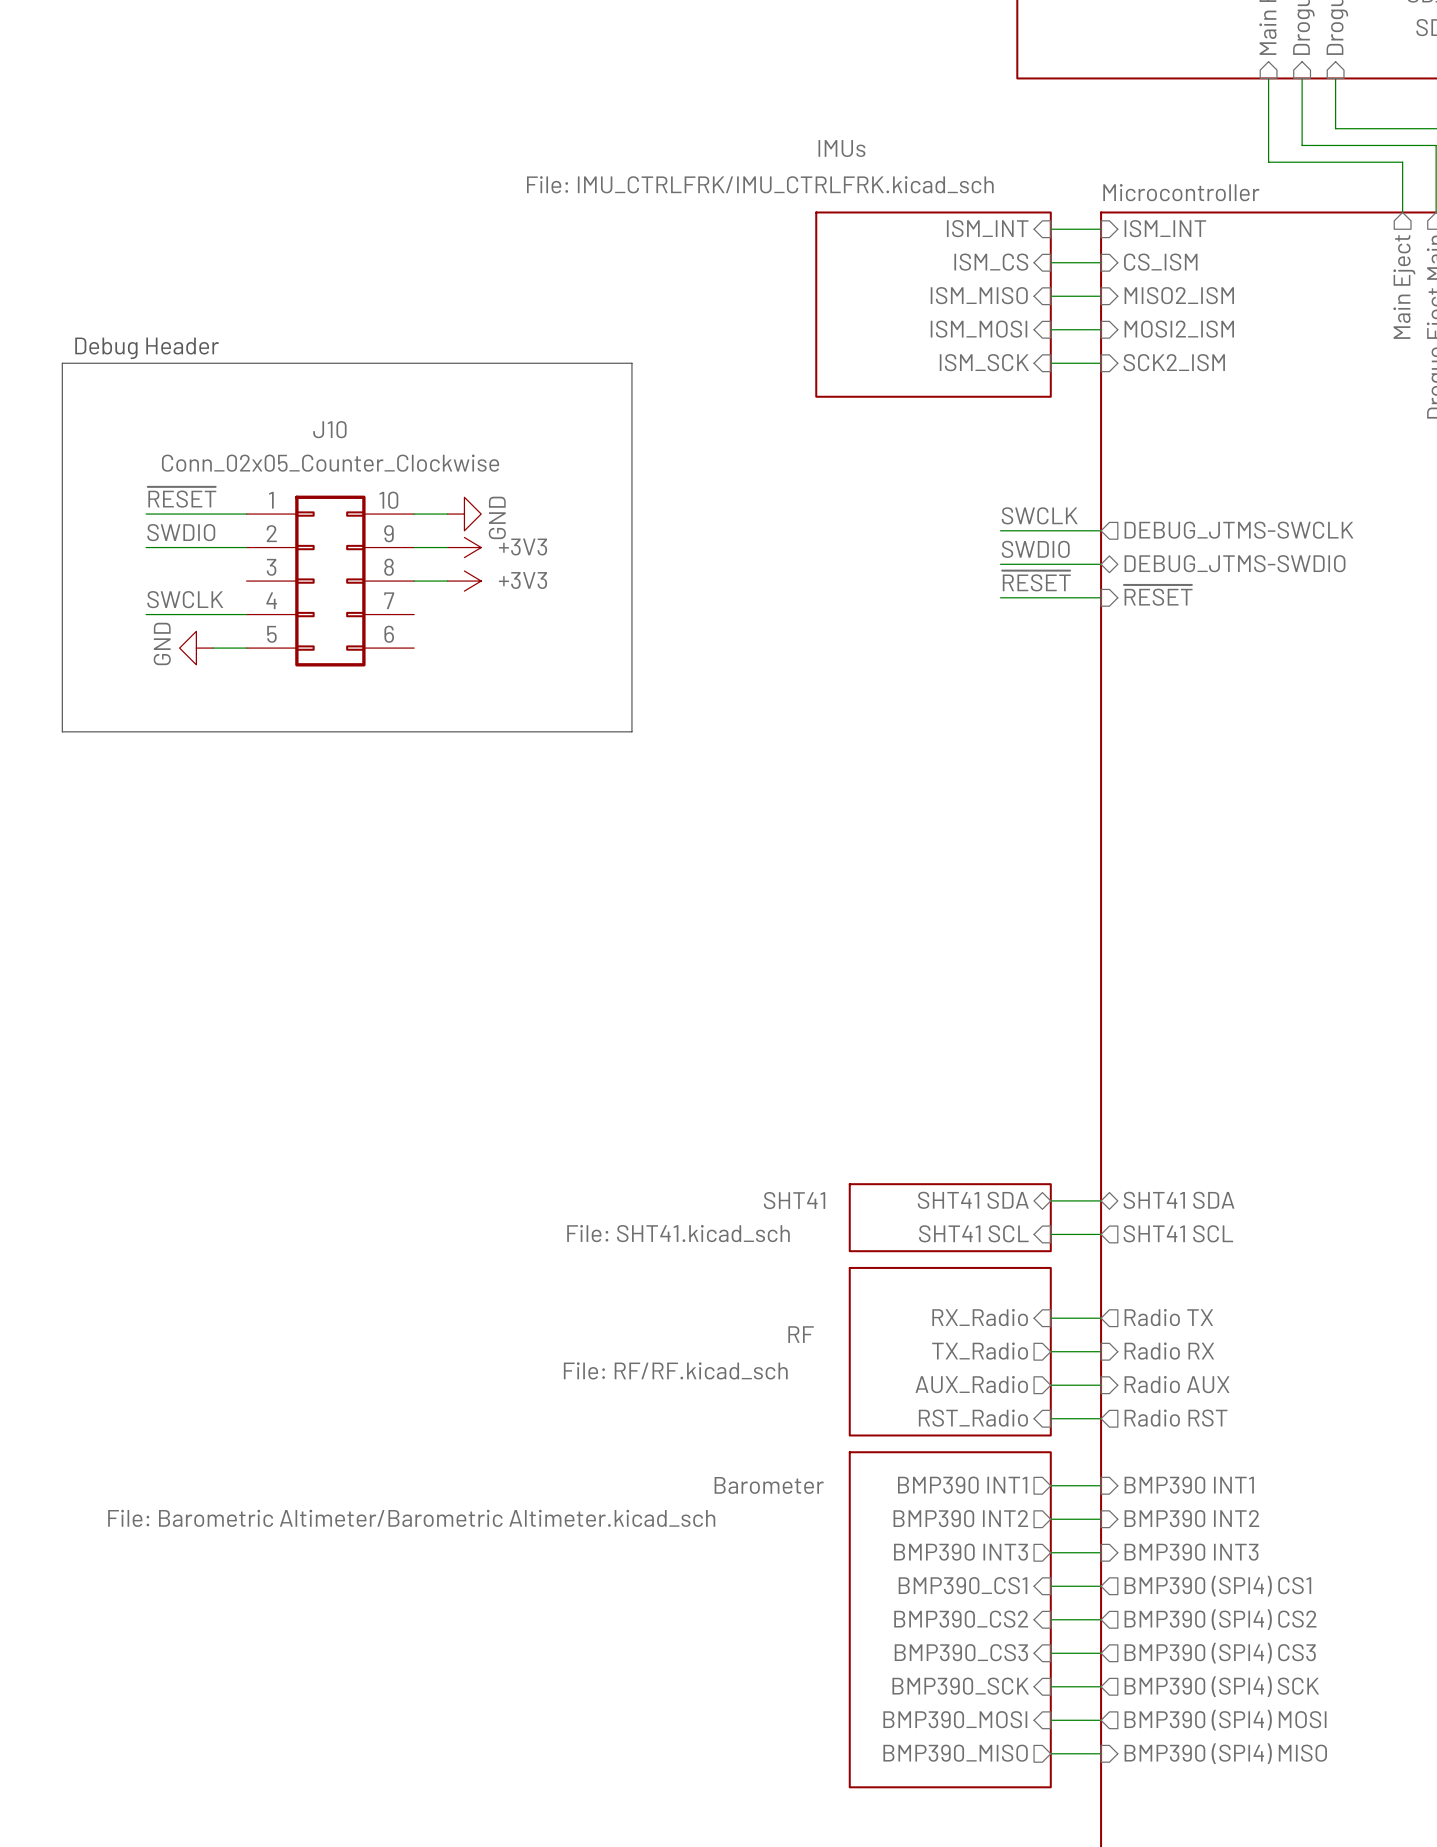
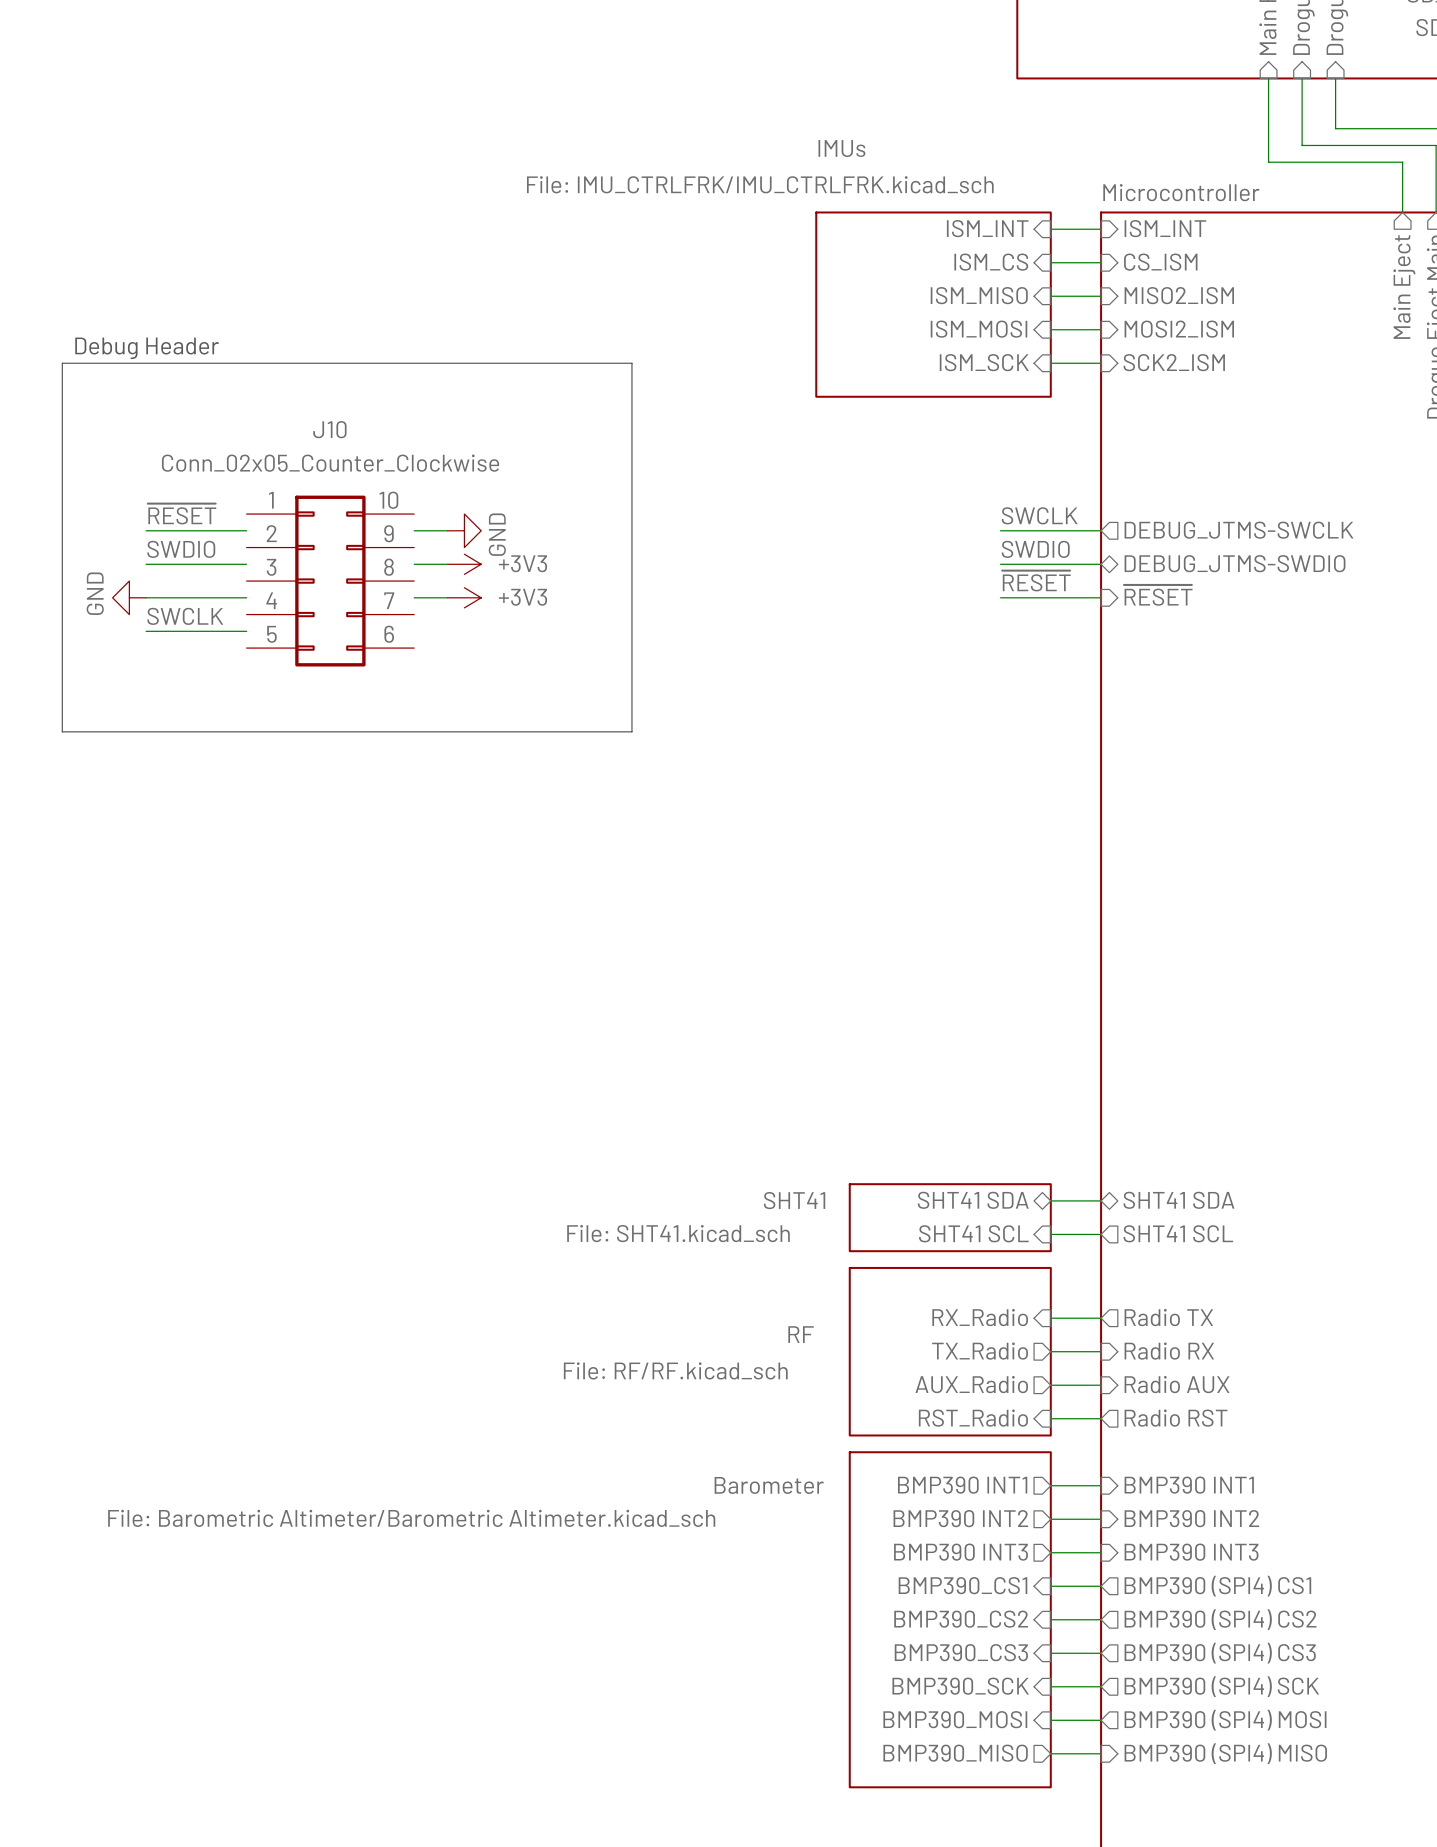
label position: ~{RESET} (182, 497) -> ~{RESET} (182, 514)
wire: (146, 514) (246, 514) -> (146, 530) (246, 530)
wire: (414, 514) (447, 514) -> (414, 530) (447, 530)
power symbol position: GND (464, 514) -> GND (464, 530)
label position: SWDIO (181, 532) -> SWDIO (181, 549)
wire: (146, 547) (246, 547) -> (146, 564) (246, 564)
wire: (414, 547) (447, 547) -> (414, 564) (447, 564)
power symbol: +3V3 (464, 547) -> none
power symbol: none -> +3V3 (464, 564)
wire: (414, 581) (447, 581) -> (414, 597) (447, 597)
power symbol: +3V3 (464, 581) -> none
wire: none -> (146, 597) (246, 597)
power symbol: none -> +3V3 (464, 597)
label position: SWCLK (185, 599) -> SWCLK (185, 616)
wire: (146, 614) (246, 614) -> (146, 631) (246, 631)
power symbol position: GND (196, 648) -> GND (129, 597)
wire: (213, 648) (246, 648) -> none

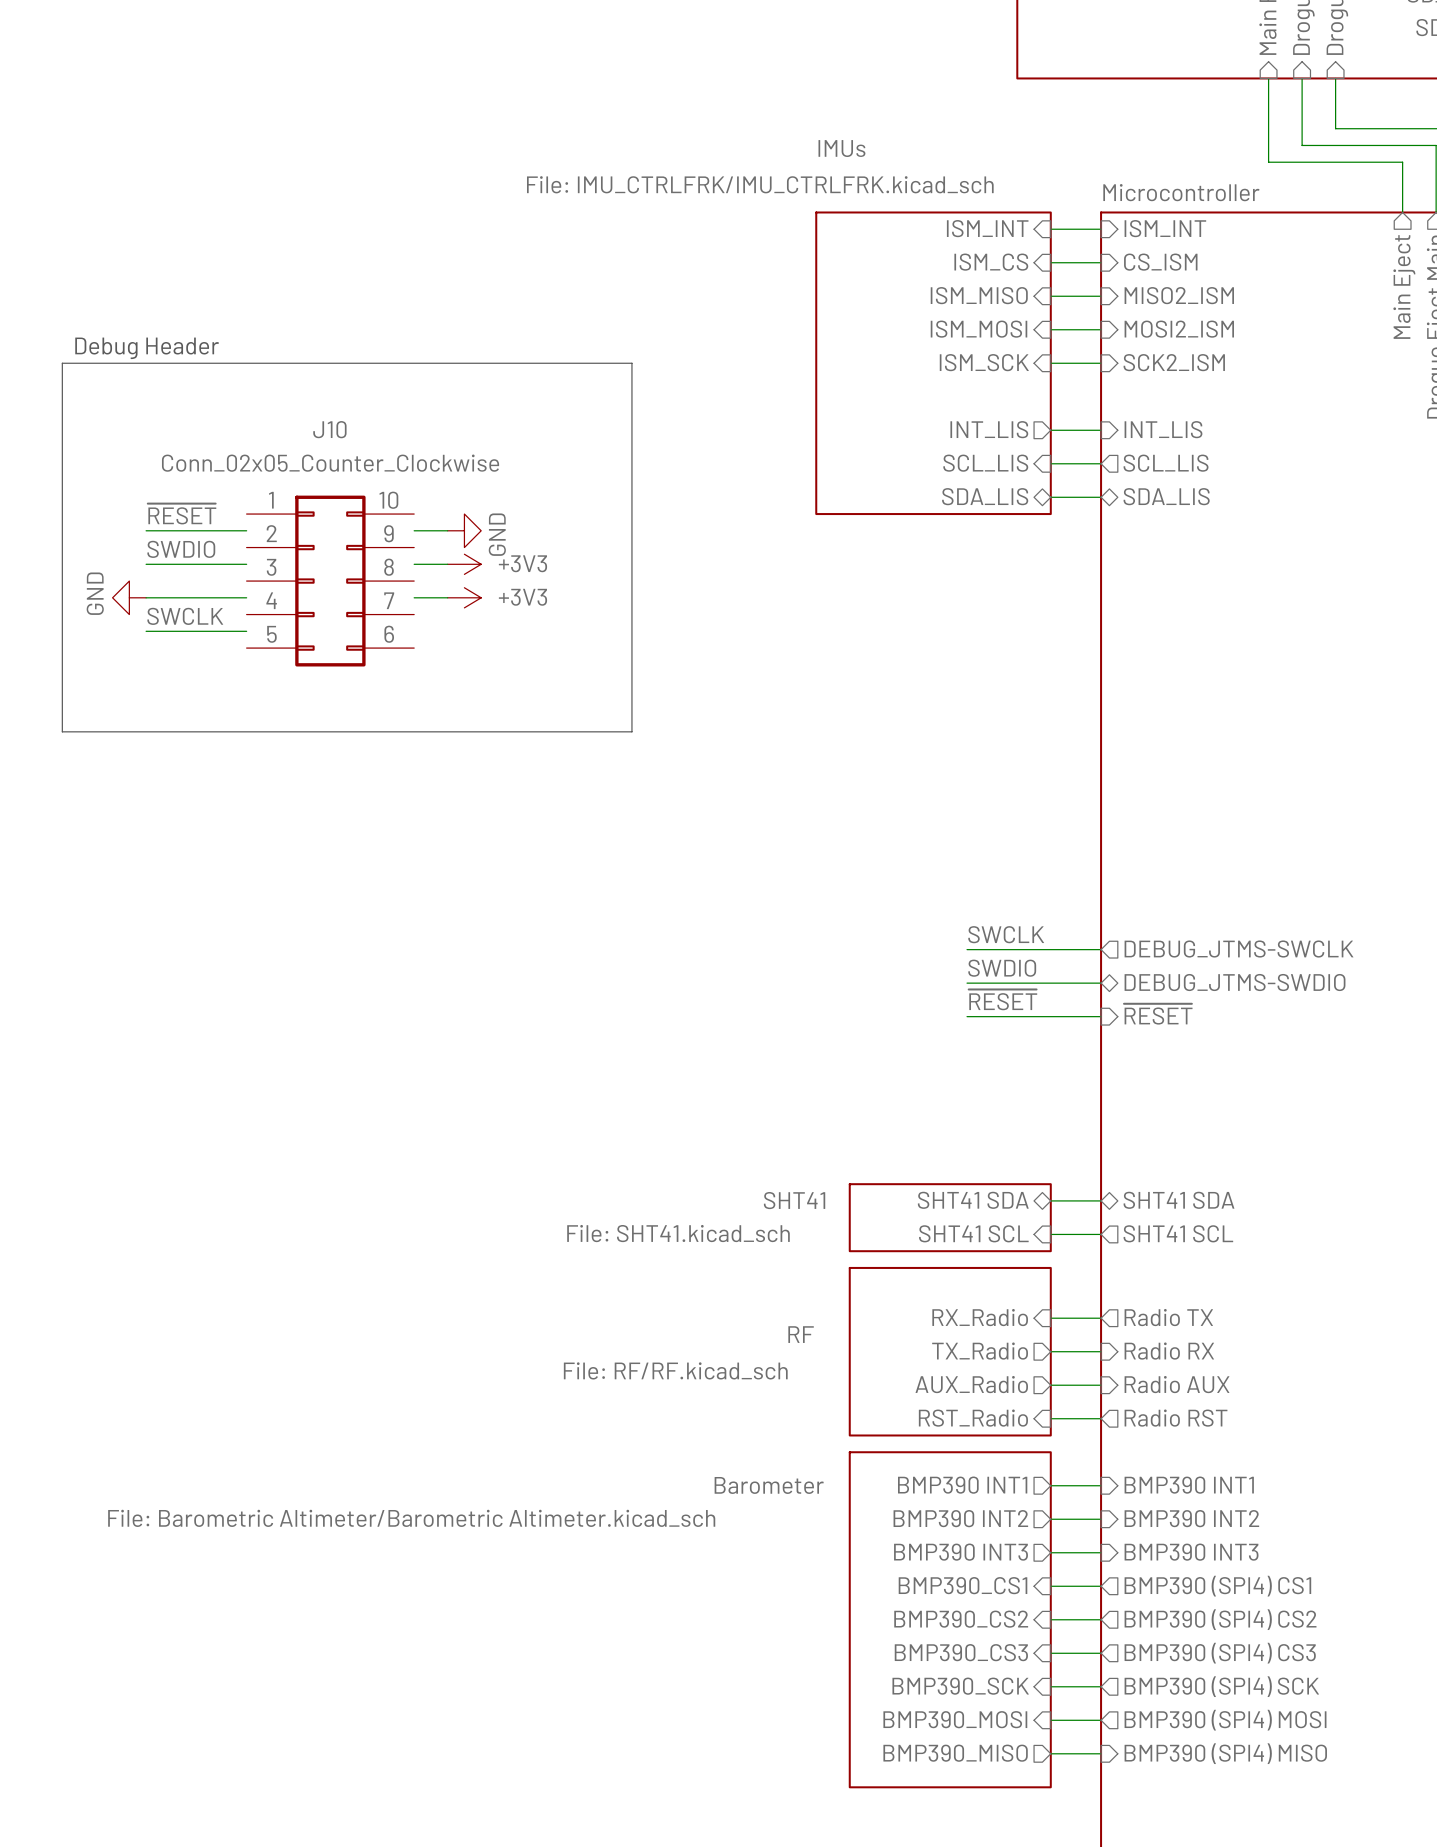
sheet IMUs: File: IMU_CTRLFRK/IMU_CTRLFRK.kicad_sch (933, 304) -> none
sheet IMUs: none -> File: IMU_CTRLFRK/IMU_CTRLFRK.kicad_sch (933, 363)
sheet pin: none -> INT_LIS (989, 429)
sheet pin: none -> INT_LIS (1163, 429)
wire: none -> (1050, 430) (1101, 430)
sheet pin: none -> SCL_LIS (985, 463)
wire: none -> (1050, 463) (1101, 463)
sheet pin: none -> SCL_LIS (1166, 463)
sheet pin: none -> SDA_LIS (985, 496)
sheet pin: none -> SDA_LIS (1166, 496)
wire: none -> (1050, 497) (1101, 497)
label: SWCLK (1039, 515) -> none
wire: (1000, 530) (1101, 530) -> none
sheet pin: DEBUG_JTMS-SWCLK (1239, 530) -> none
label: SWDIO (1035, 549) -> none
sheet pin: DEBUG_JTMS-SWDIO (1235, 563) -> none
wire: (1000, 564) (1101, 564) -> none
label: ~{RESET} (1036, 581) -> none
sheet pin: ~{RESET} (1158, 595) -> none
wire: (1000, 597) (1101, 597) -> none
label: none -> SWCLK (1006, 934)
wire: none -> (967, 949) (1101, 949)
sheet pin: none -> DEBUG_JTMS-SWCLK (1239, 949)
label: none -> SWDIO (1002, 968)
sheet pin: none -> DEBUG_JTMS-SWDIO (1235, 982)
wire: none -> (967, 983) (1101, 983)
label: none -> ~{RESET} (1002, 999)
sheet pin: none -> ~{RESET} (1158, 1014)
wire: none -> (967, 1016) (1101, 1016)

